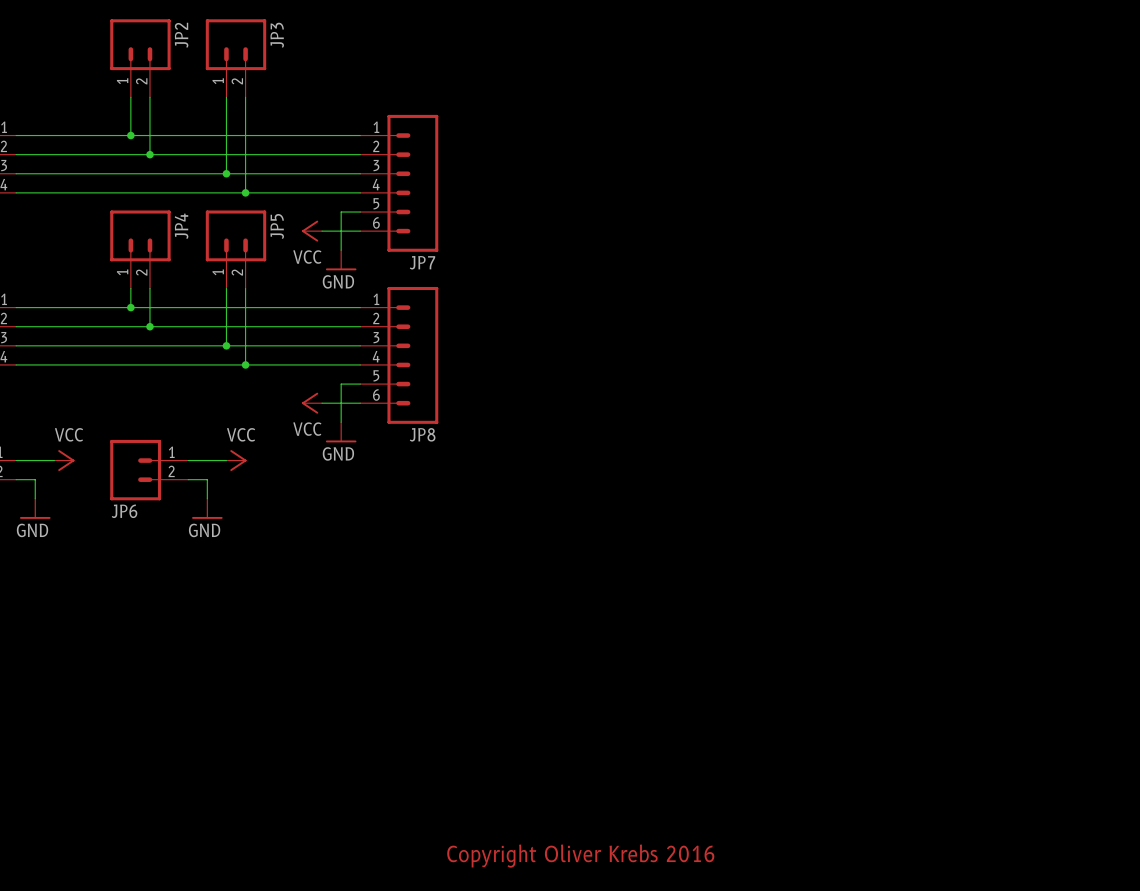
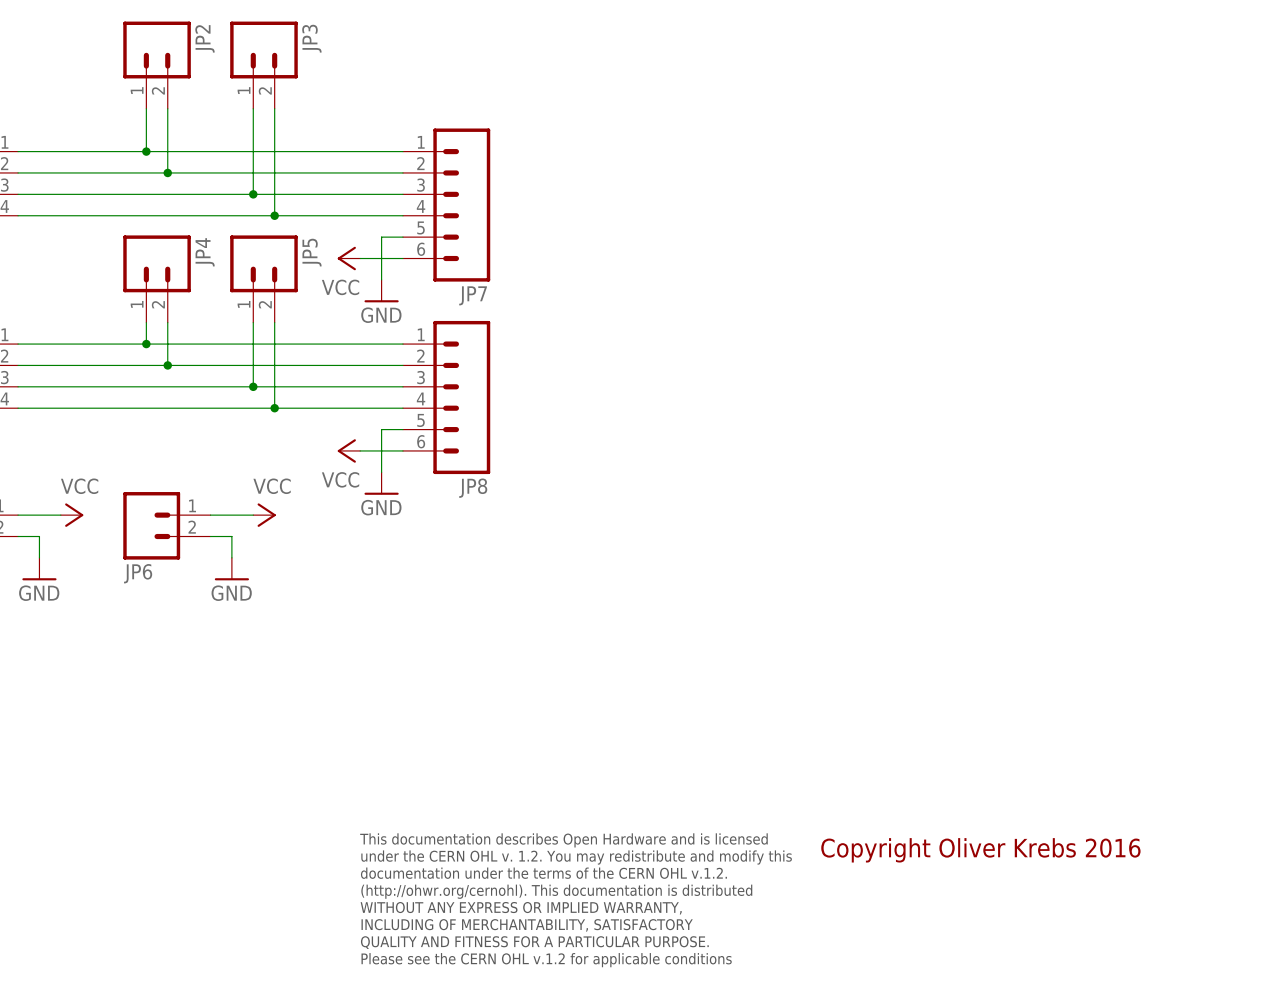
text: none -> This documentation describes Open Hardware and is licensed (563, 840)
text: none -> Copyright Oliver Krebs 2016 (980, 850)
text: none -> under the CERN OHL v. 1.2. You may redistribute and modify this (576, 857)
text: none -> documentation under the terms of the CERN OHL v.1.2. (543, 873)
text: none -> (http://ohwr.org/cernohl). This documentation is distributed (556, 891)
text: none -> WITHOUT ANY EXPRESS OR IMPLIED WARRANTY, (521, 908)
text: none -> INCLUDING OF MERCHANTABILITY, SATISFACTORY (527, 925)
text: none -> QUALITY AND FITNESS FOR A PARTICULAR PURPOSE. (534, 942)
text: Copyright Oliver Krebs 2016 (580, 856) -> none
text: none -> Please see the CERN OHL v.1.2 for applicable conditions (546, 960)

